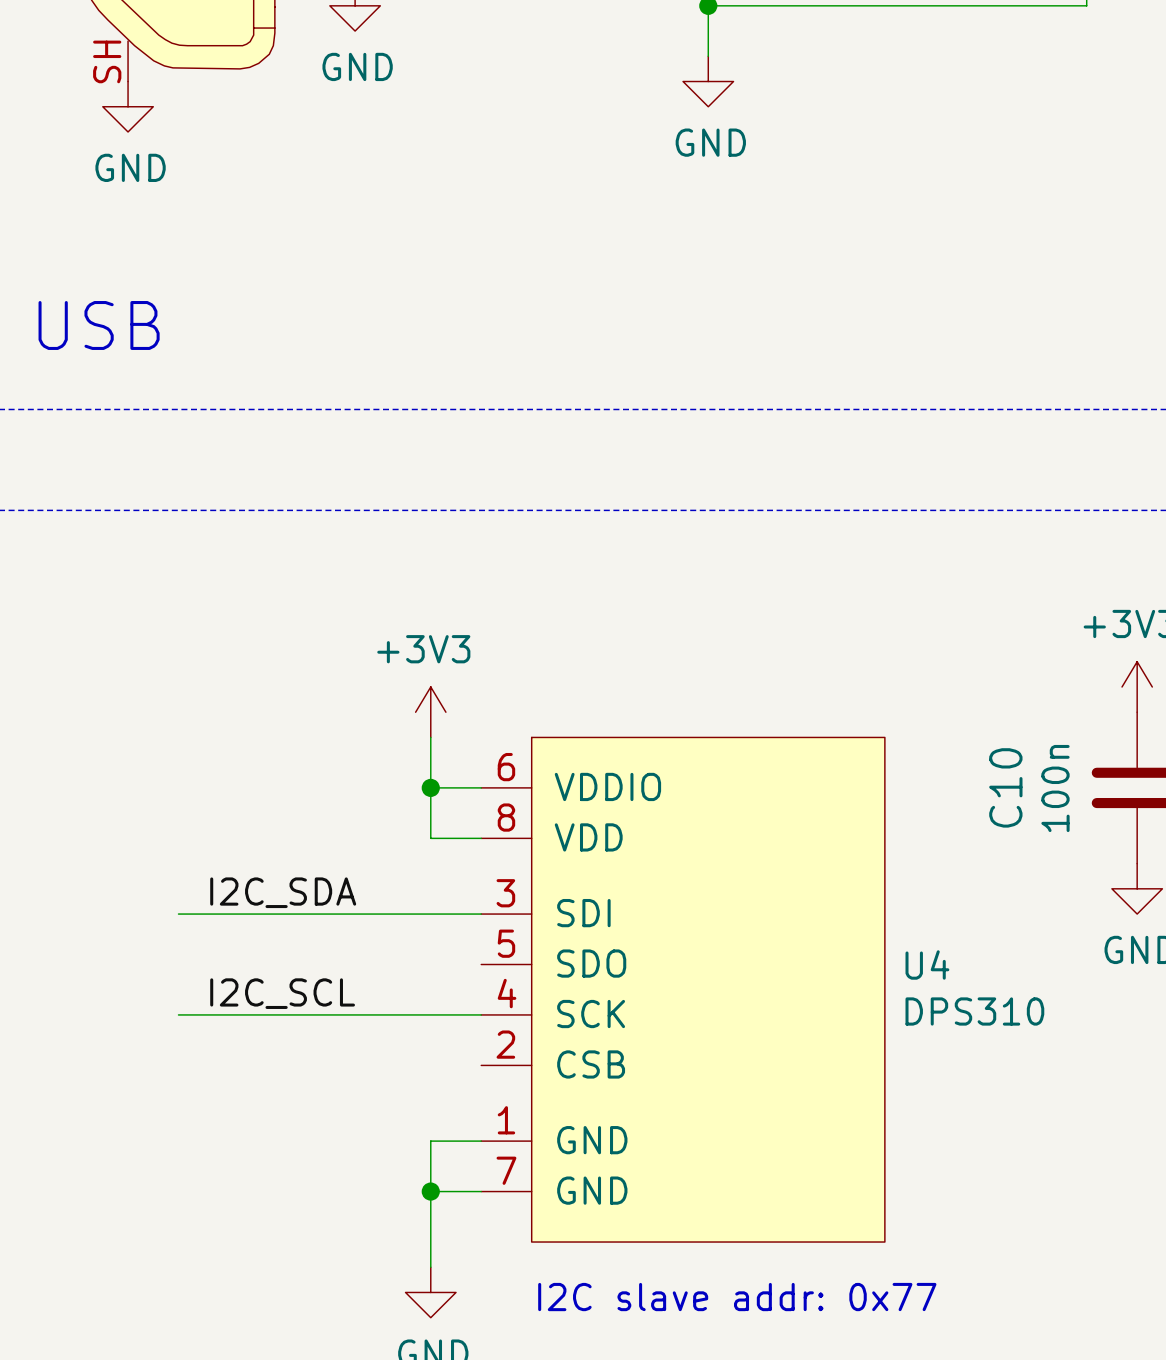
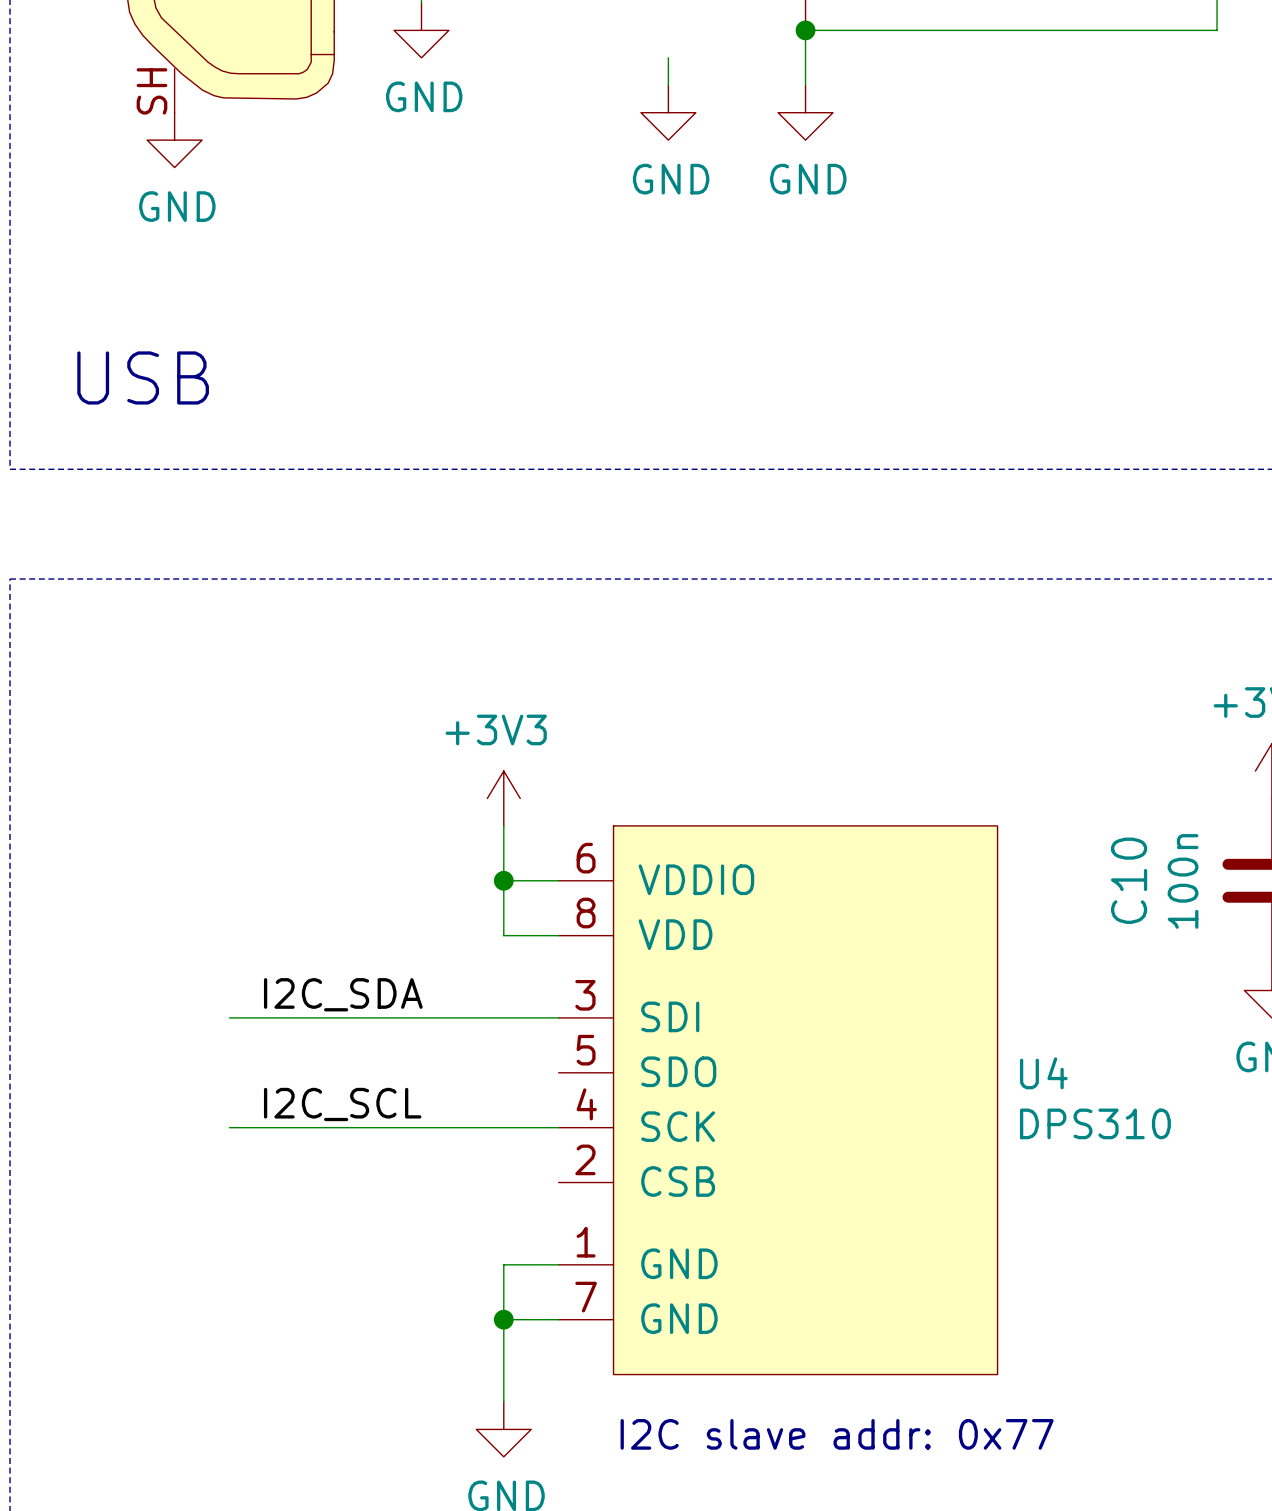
wire: none -> (668, 57) (668, 85)
power symbol: none -> GND (668, 112)

